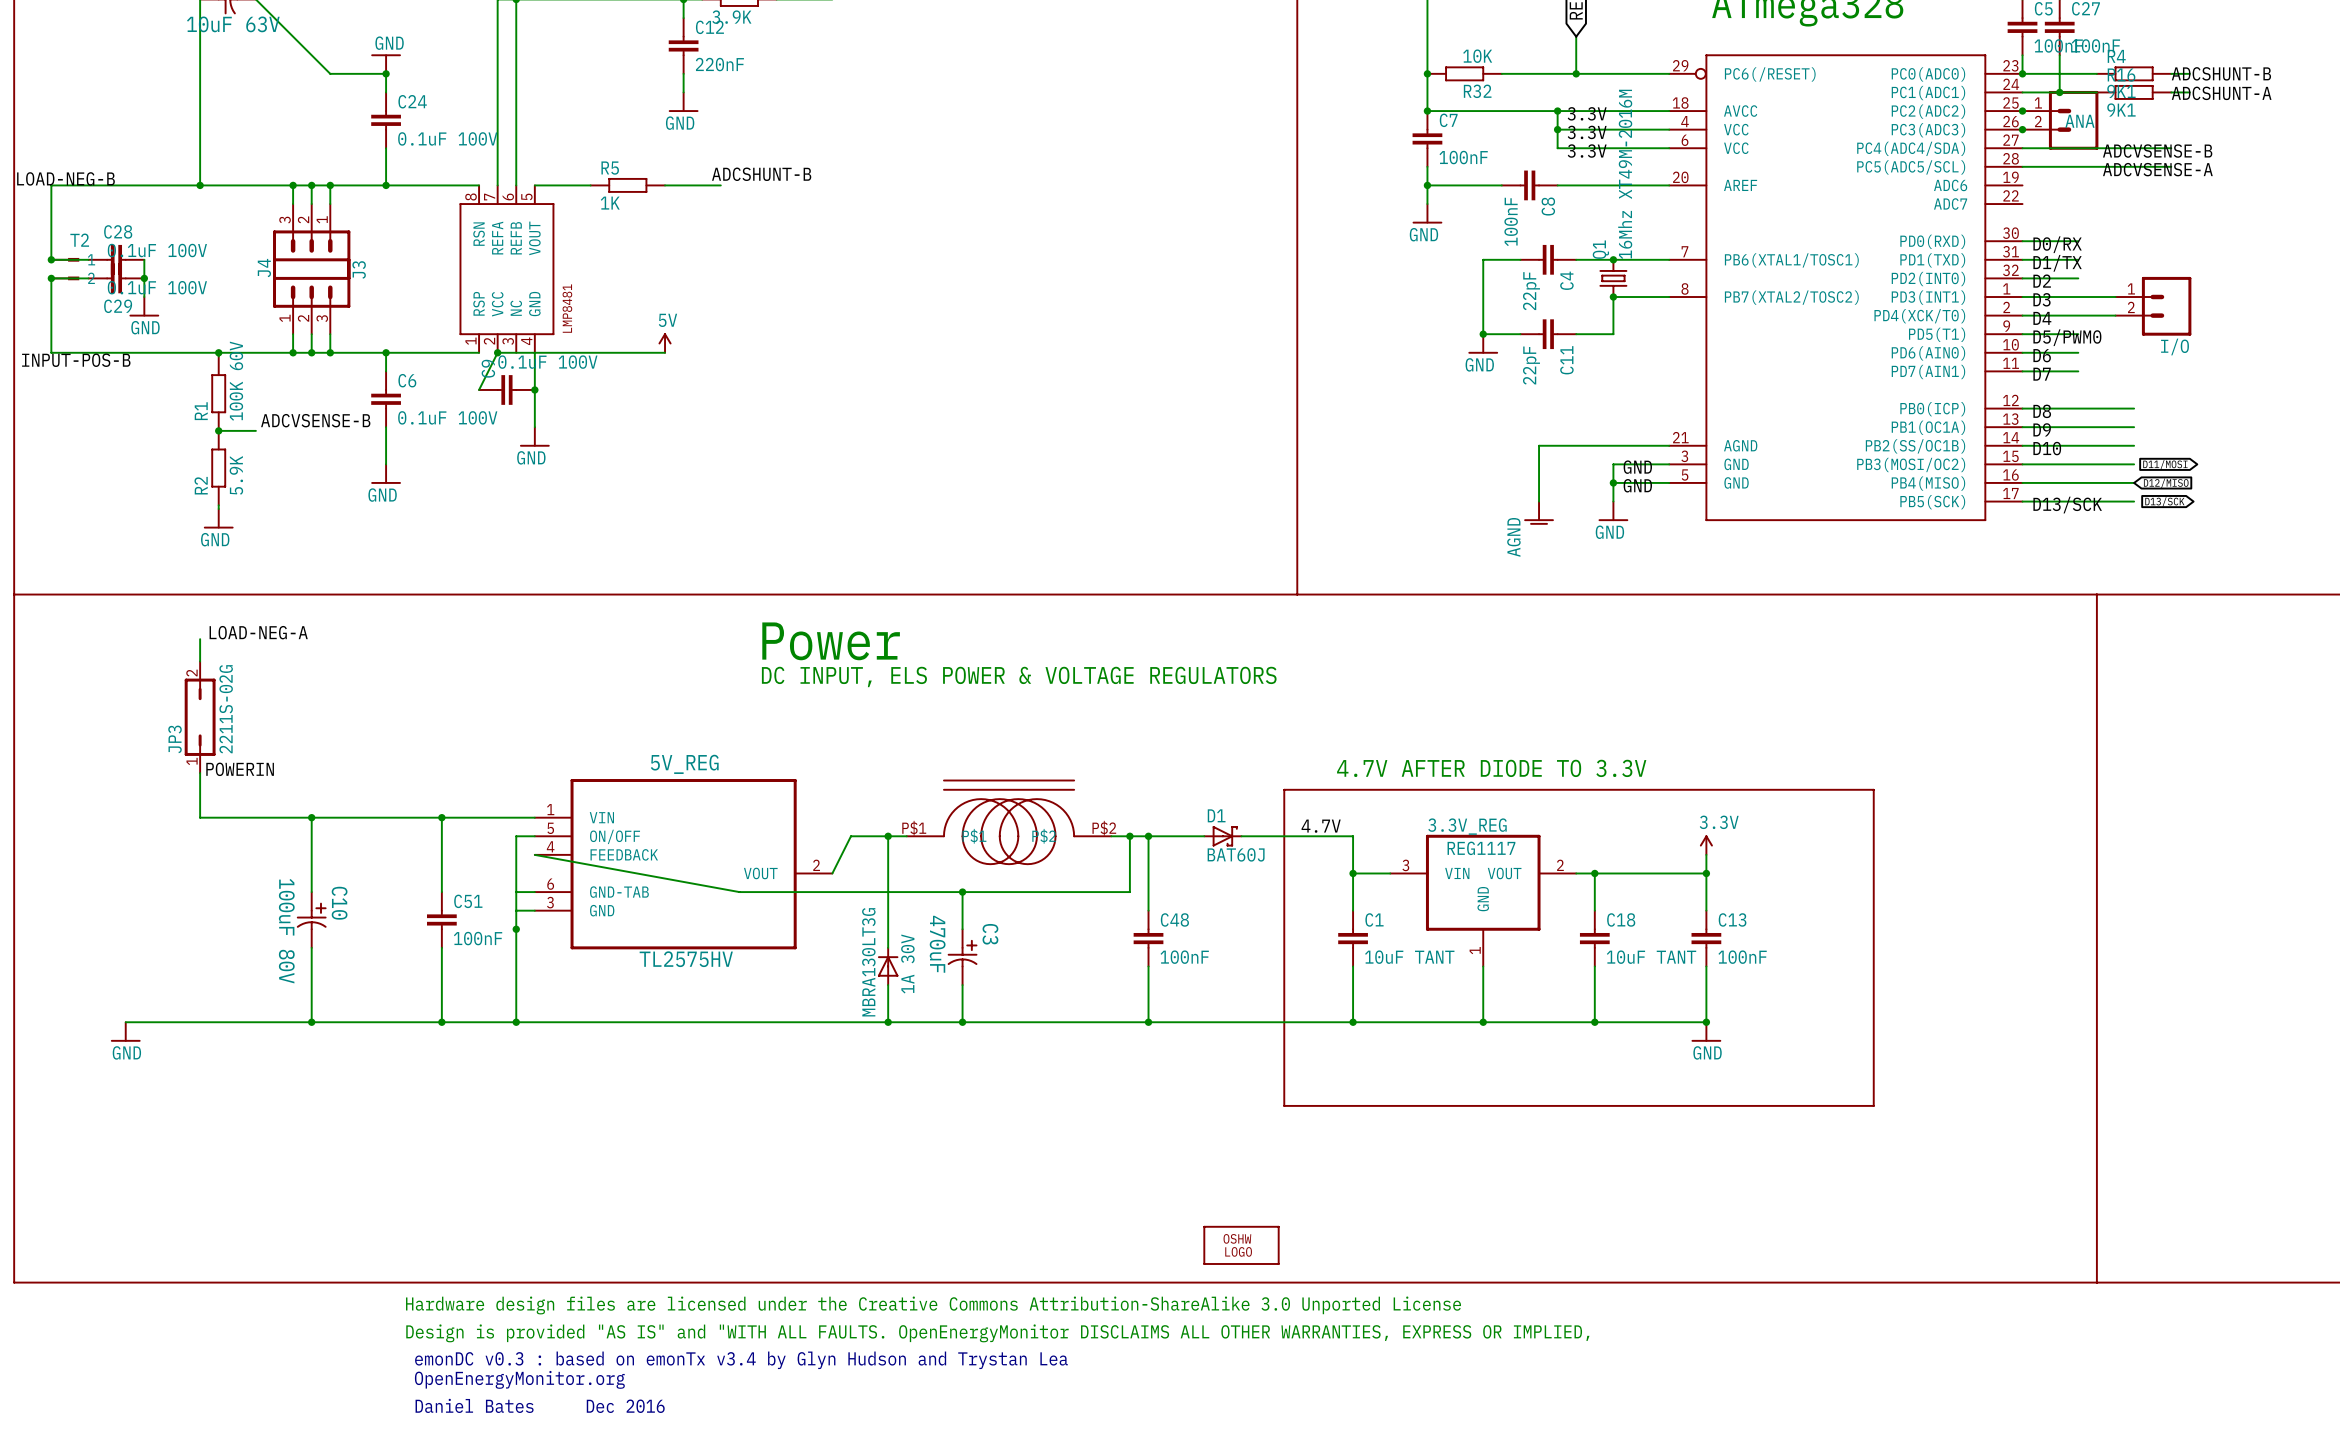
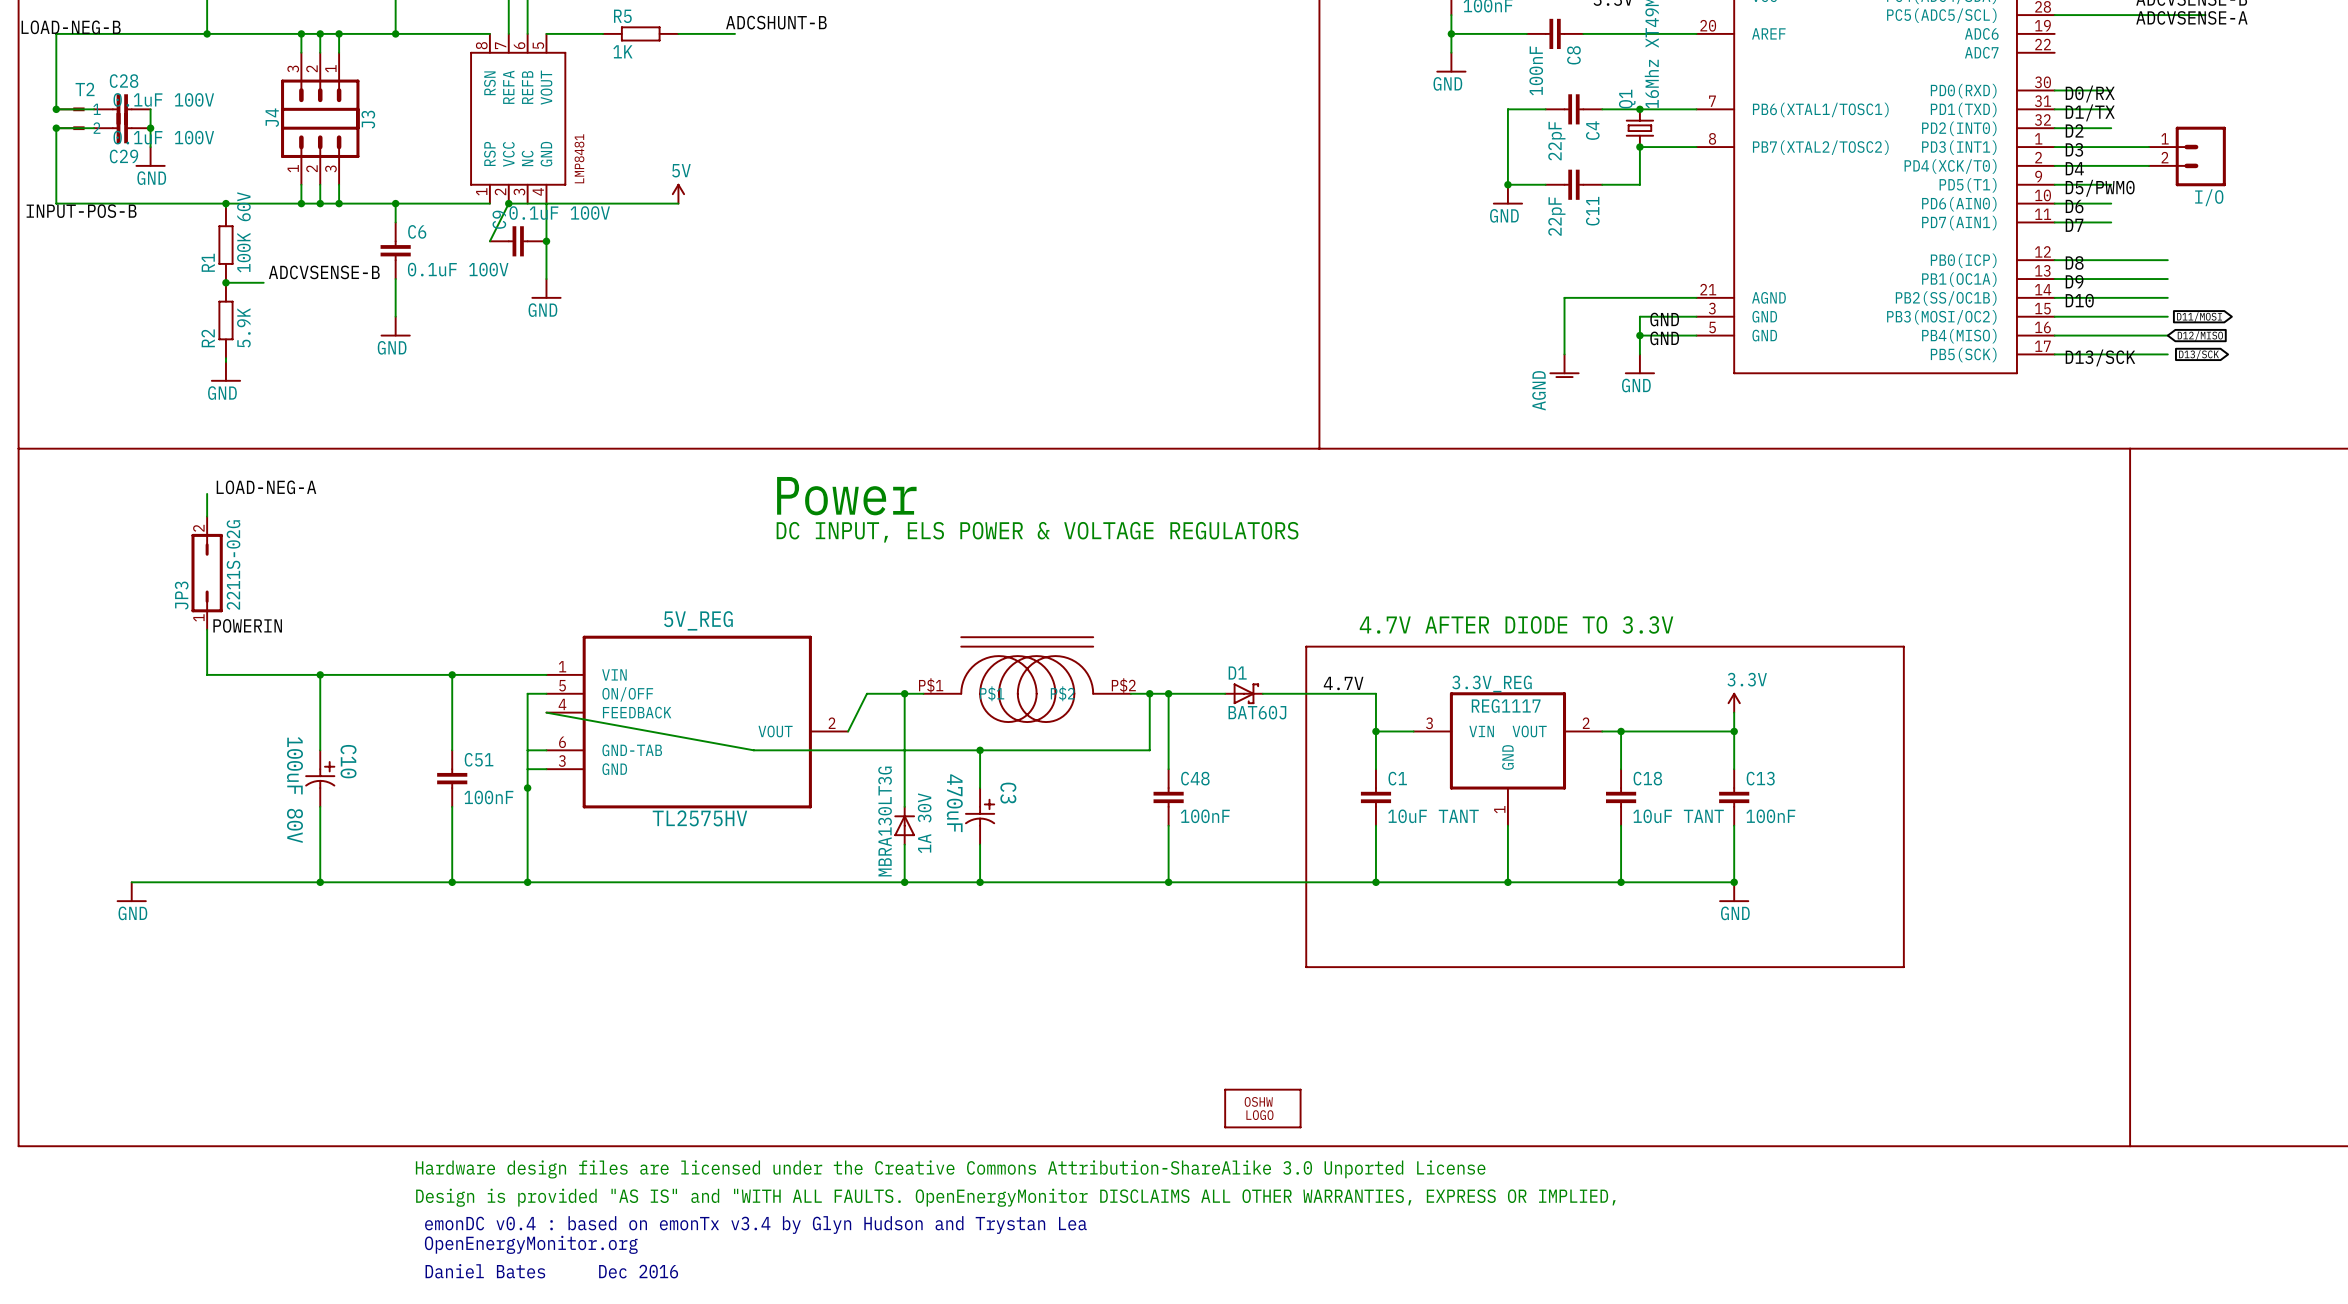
text: emonDC v0.3 : based on emonTx v3.4 by Glyn Hudson and Trystan Lea (741, 1360) -> emonDC v0.4 : based on emonTx v3.4 by Glyn Hudson and Trystan Lea (755, 1225)

